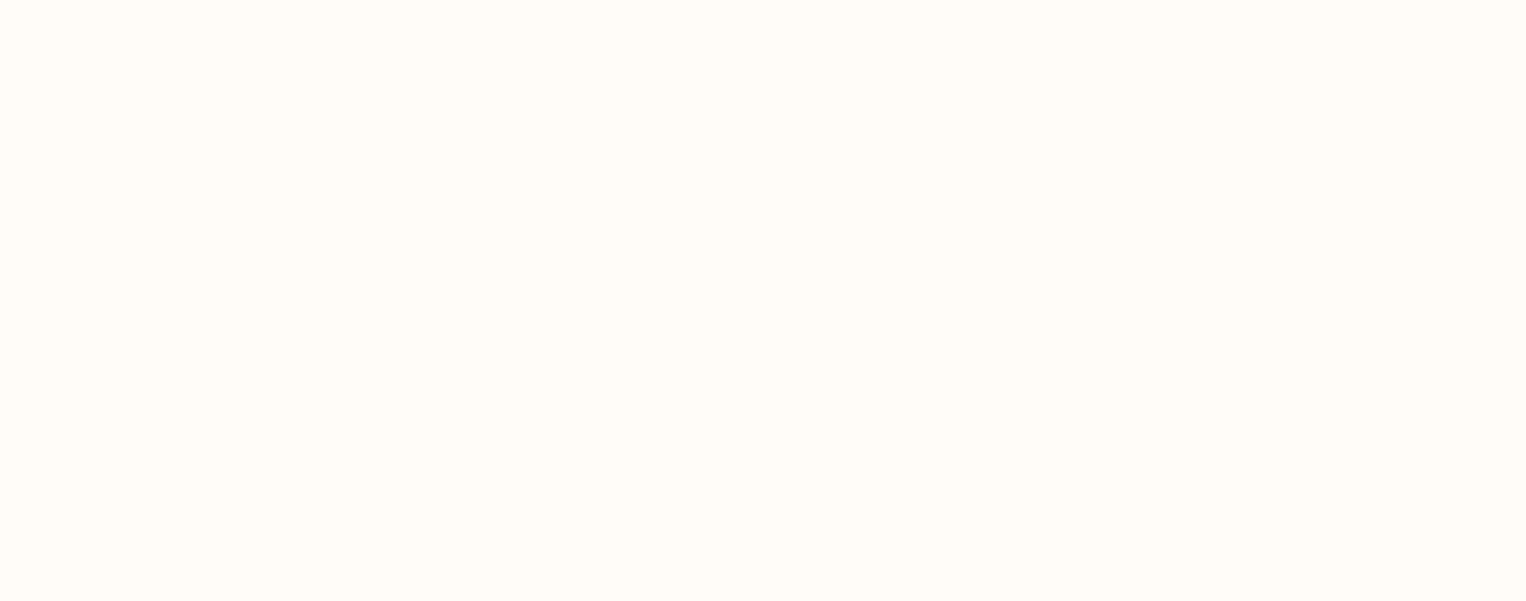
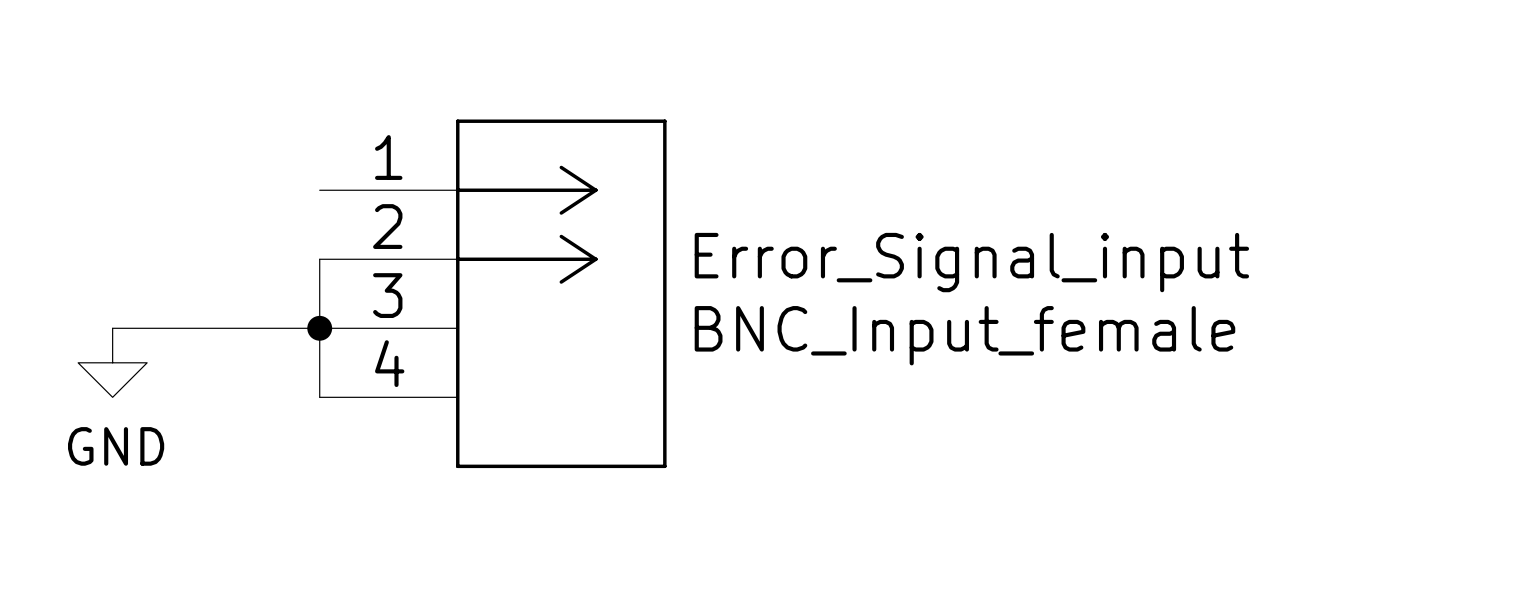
wire: none -> (319, 259) (319, 397)
Error_Signal_input: none -> BNC_Input_female (493, 293)
wire: none -> (112, 328) (319, 328)
junction: none -> (319, 328)
power symbol: none -> GND (112, 362)

